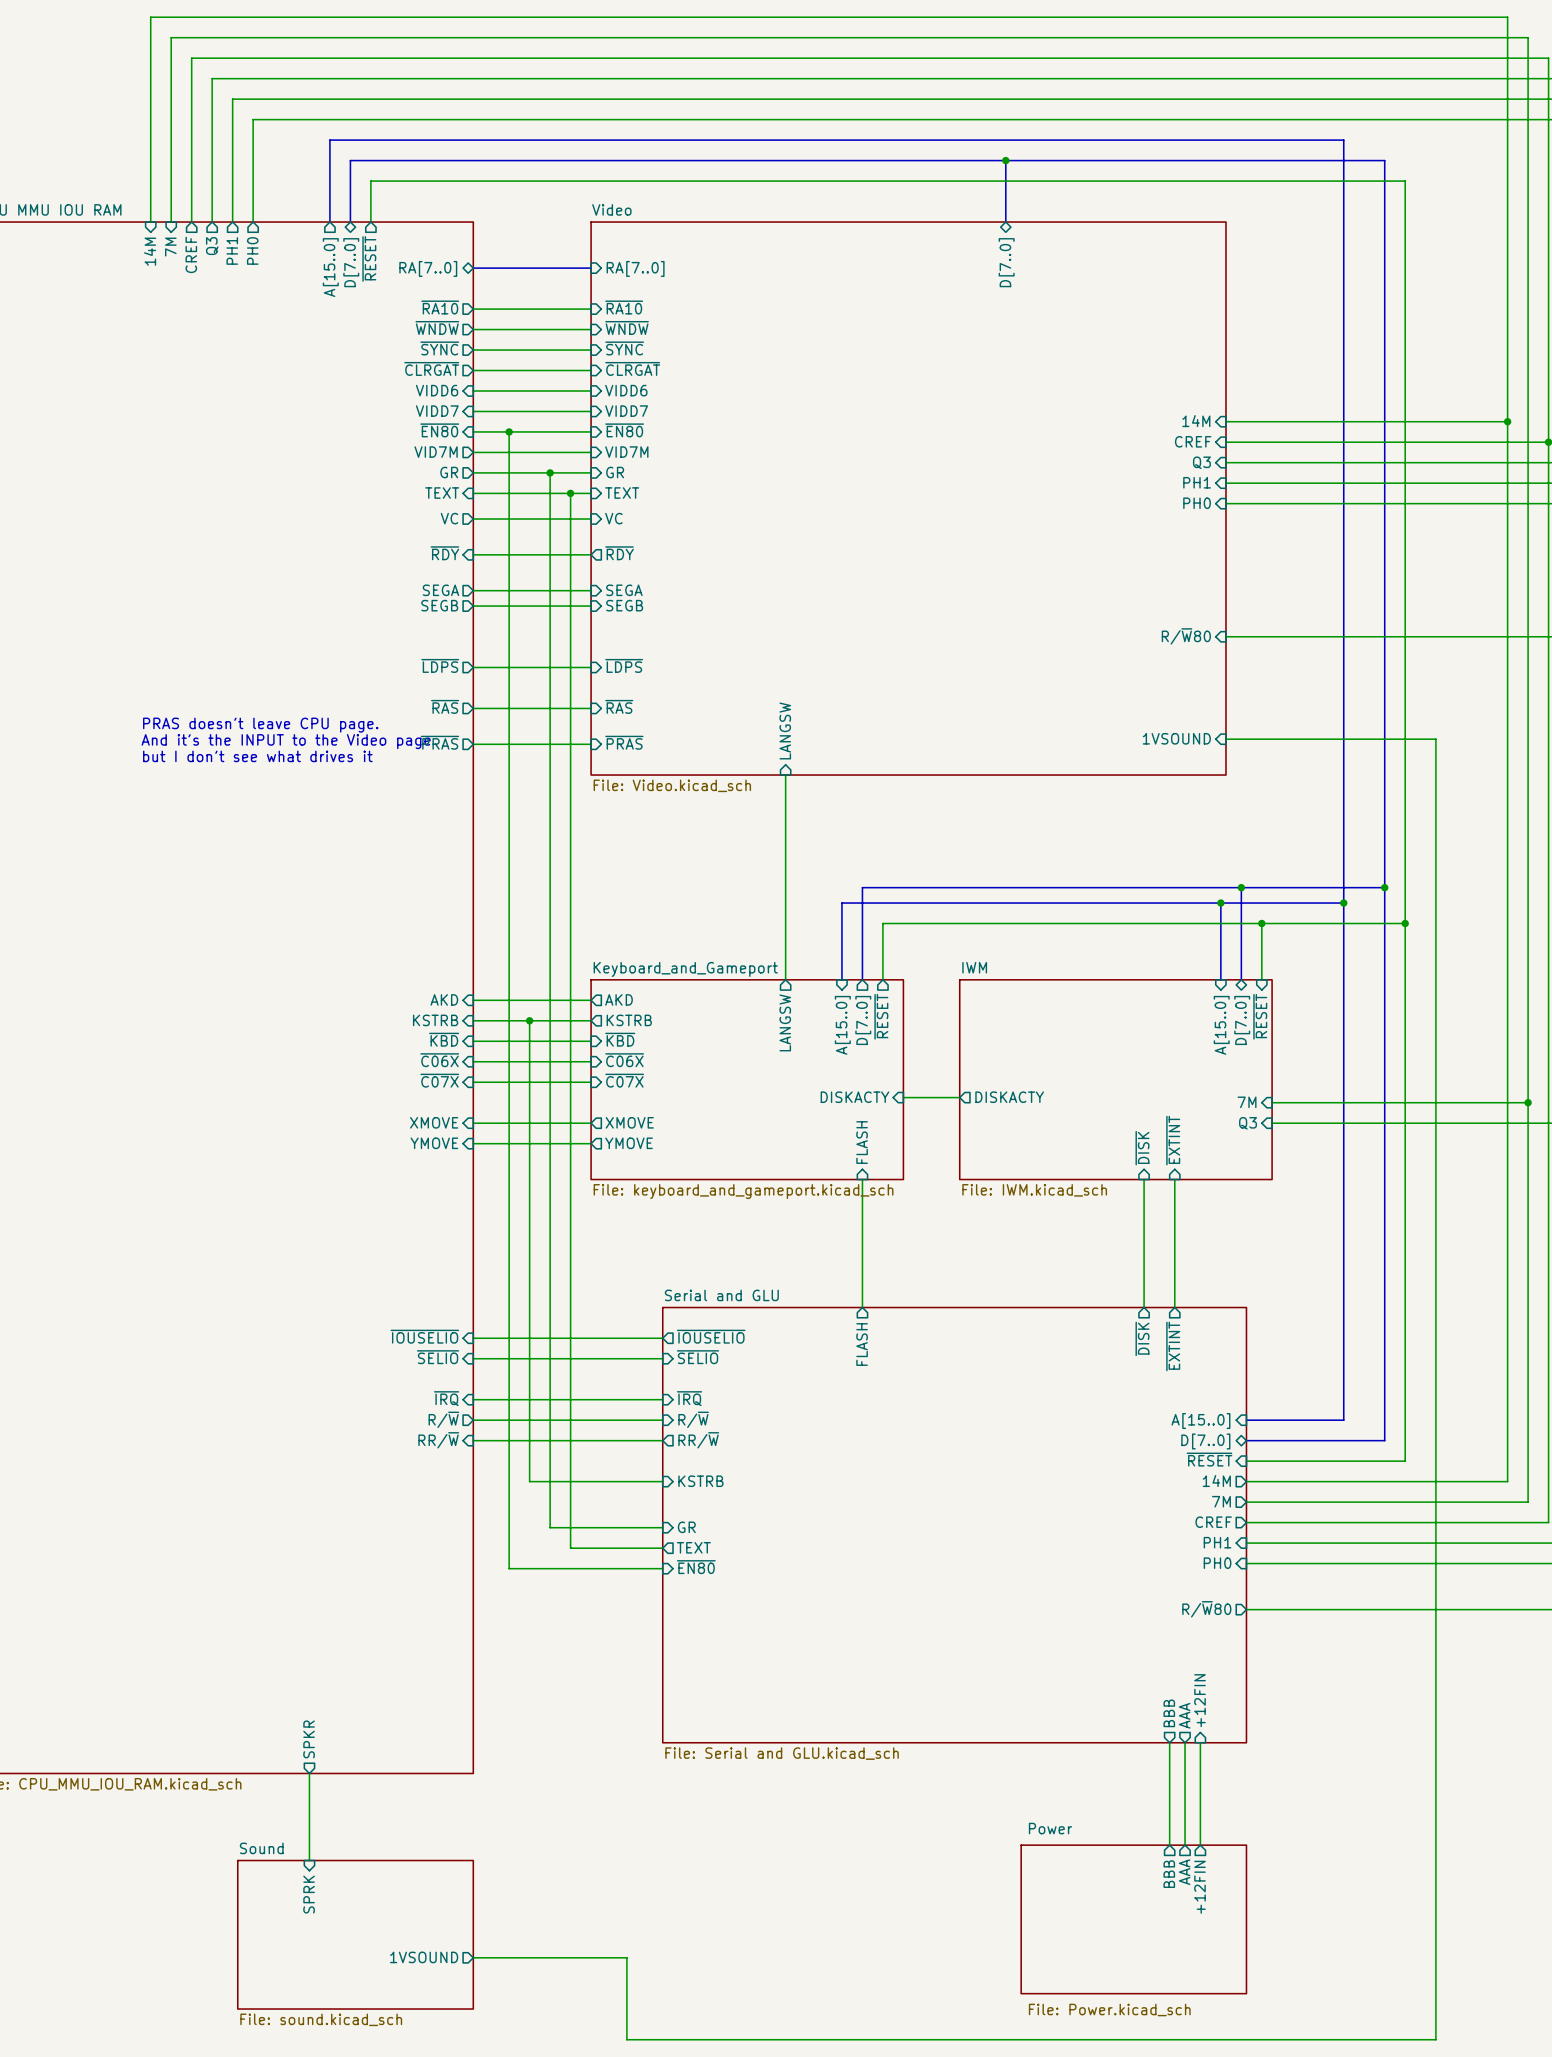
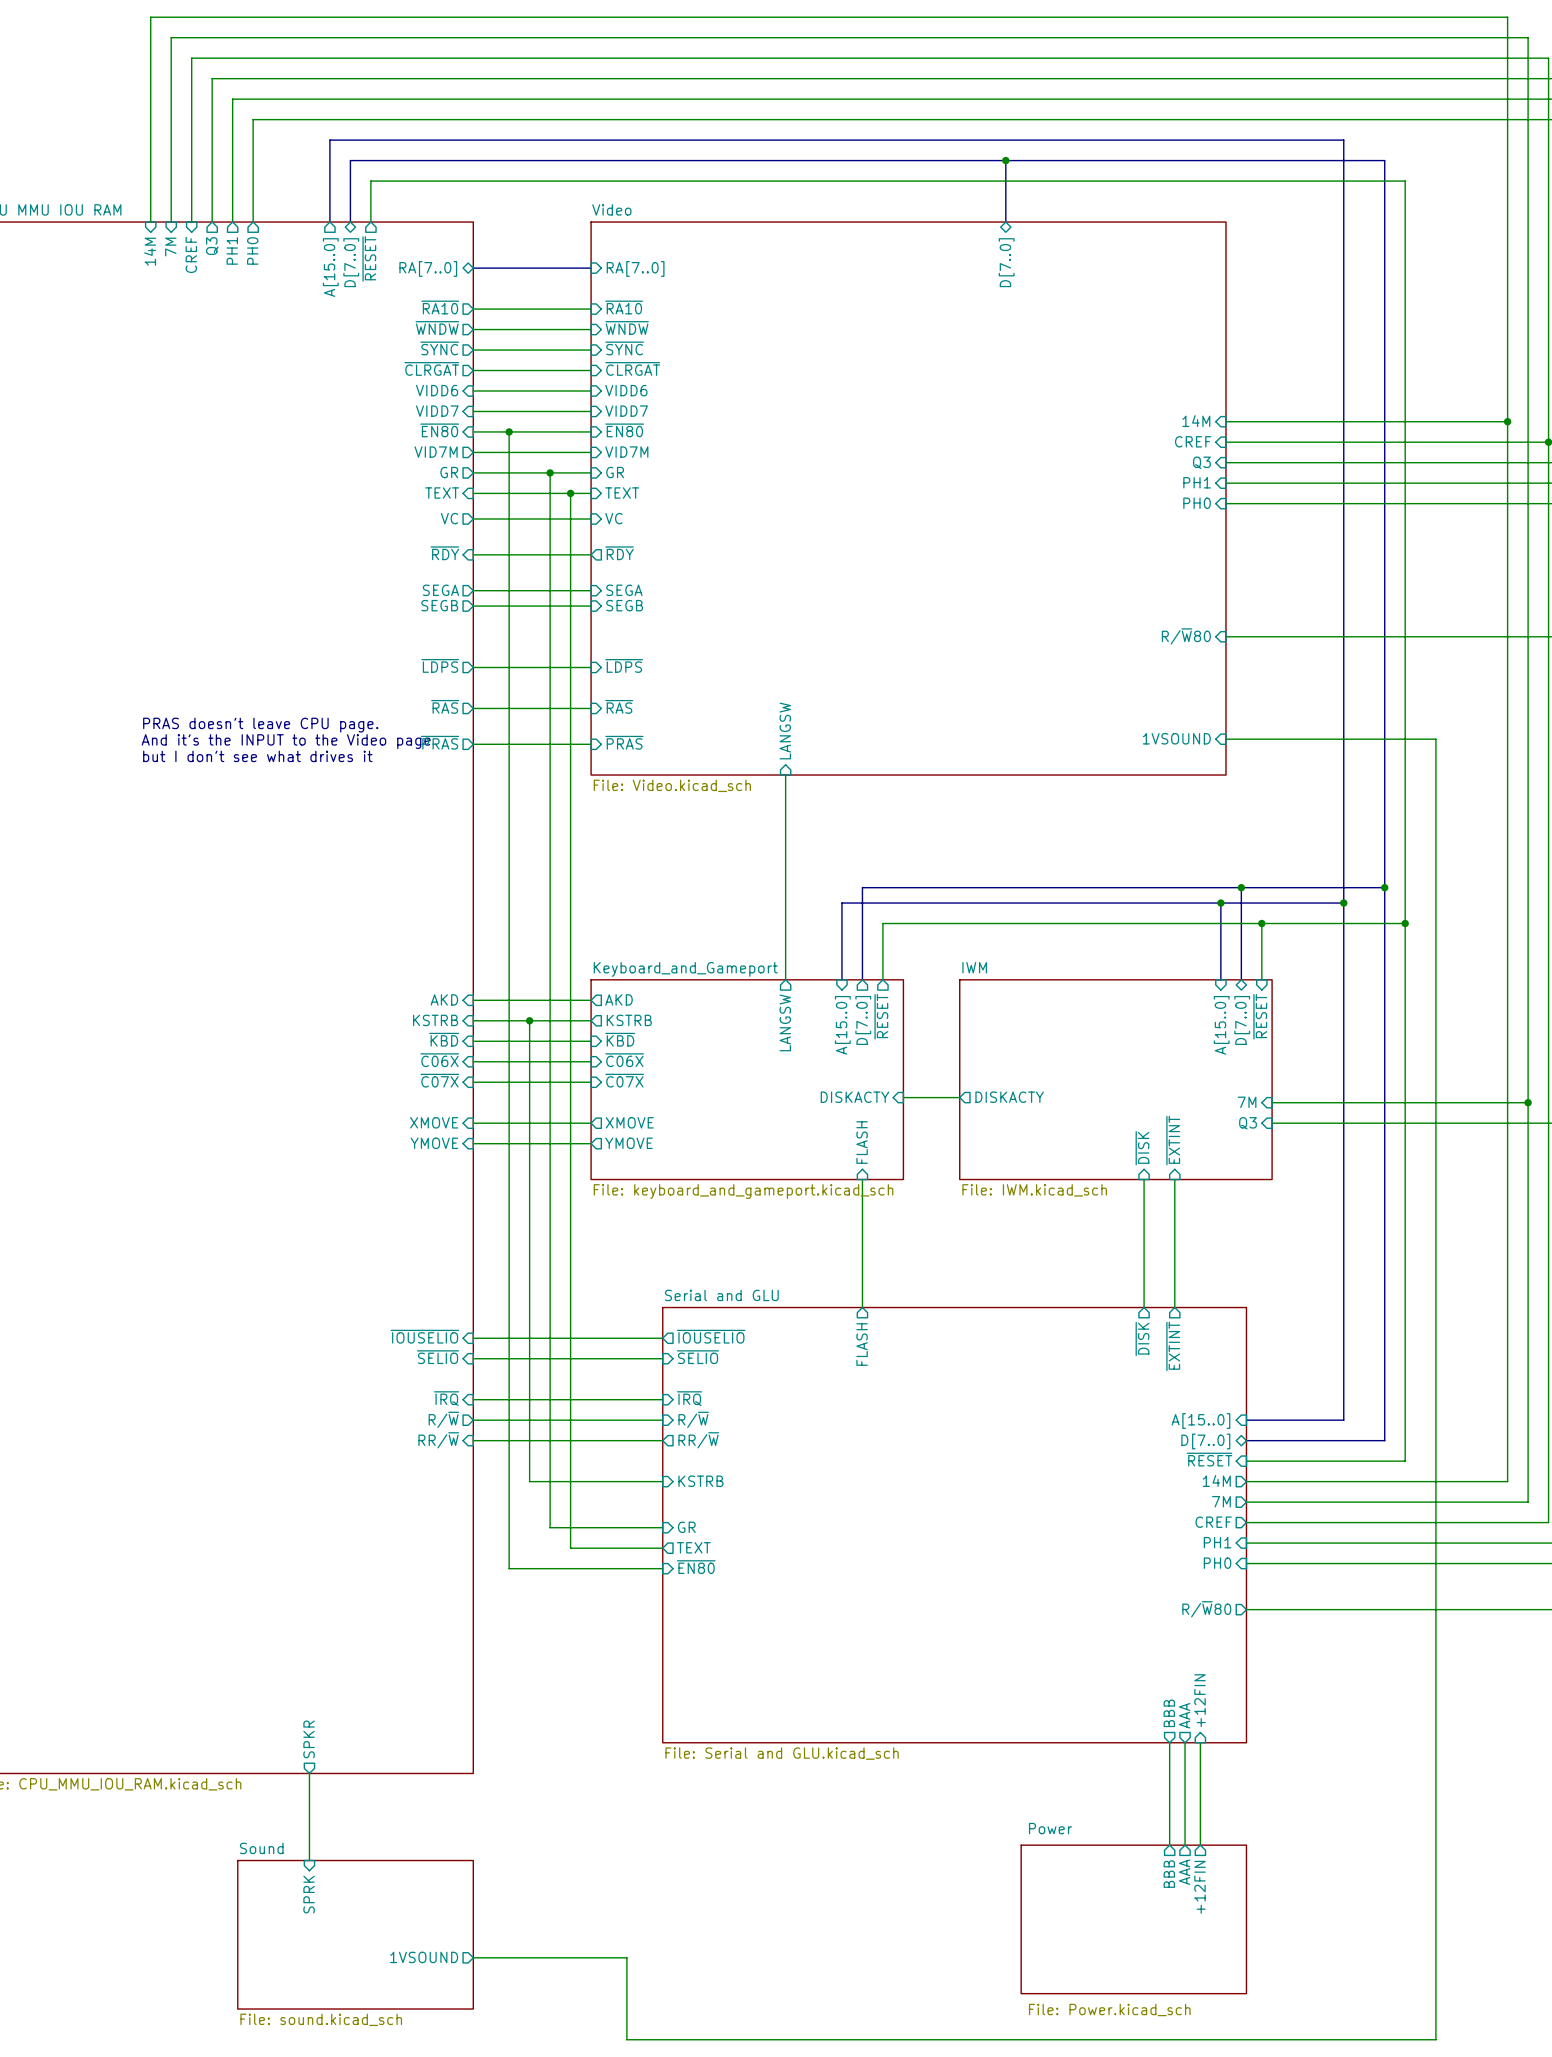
sheet pin shape: output (191, 254) -> input (191, 254)

